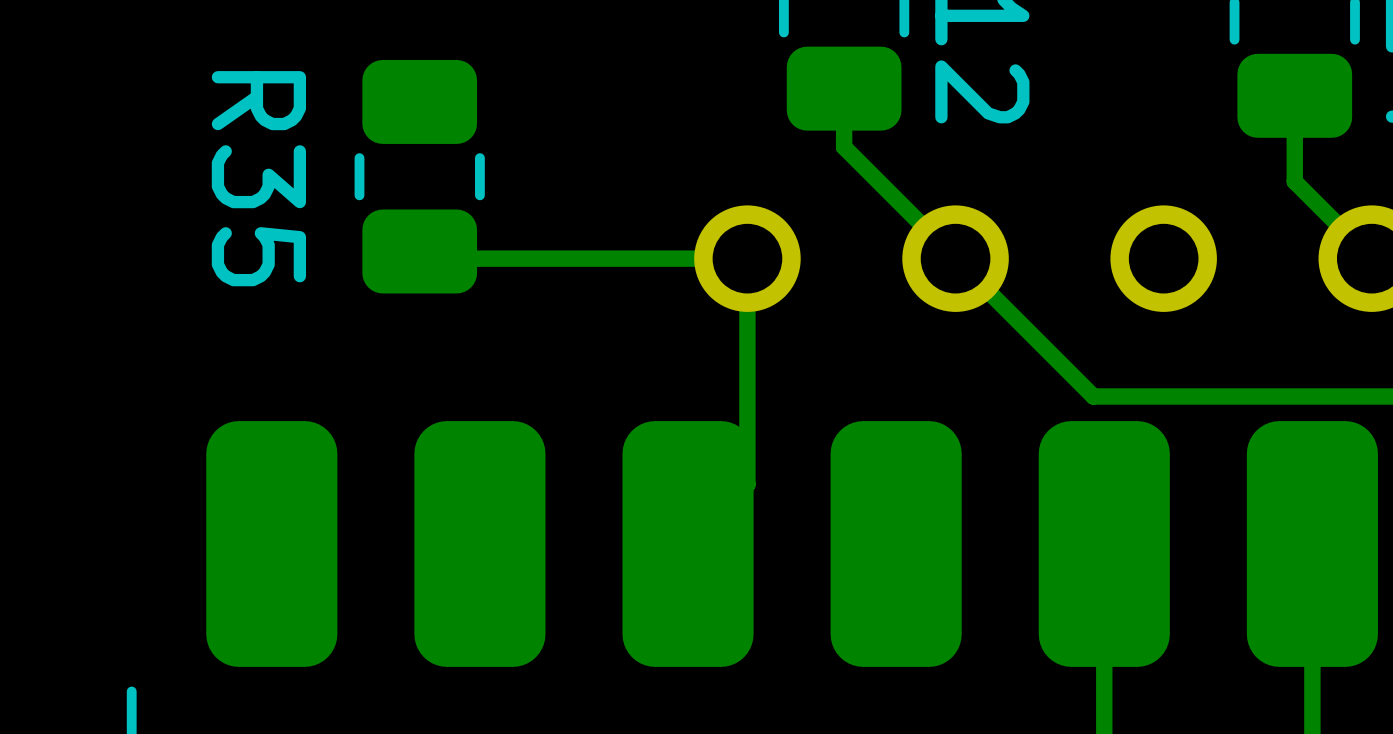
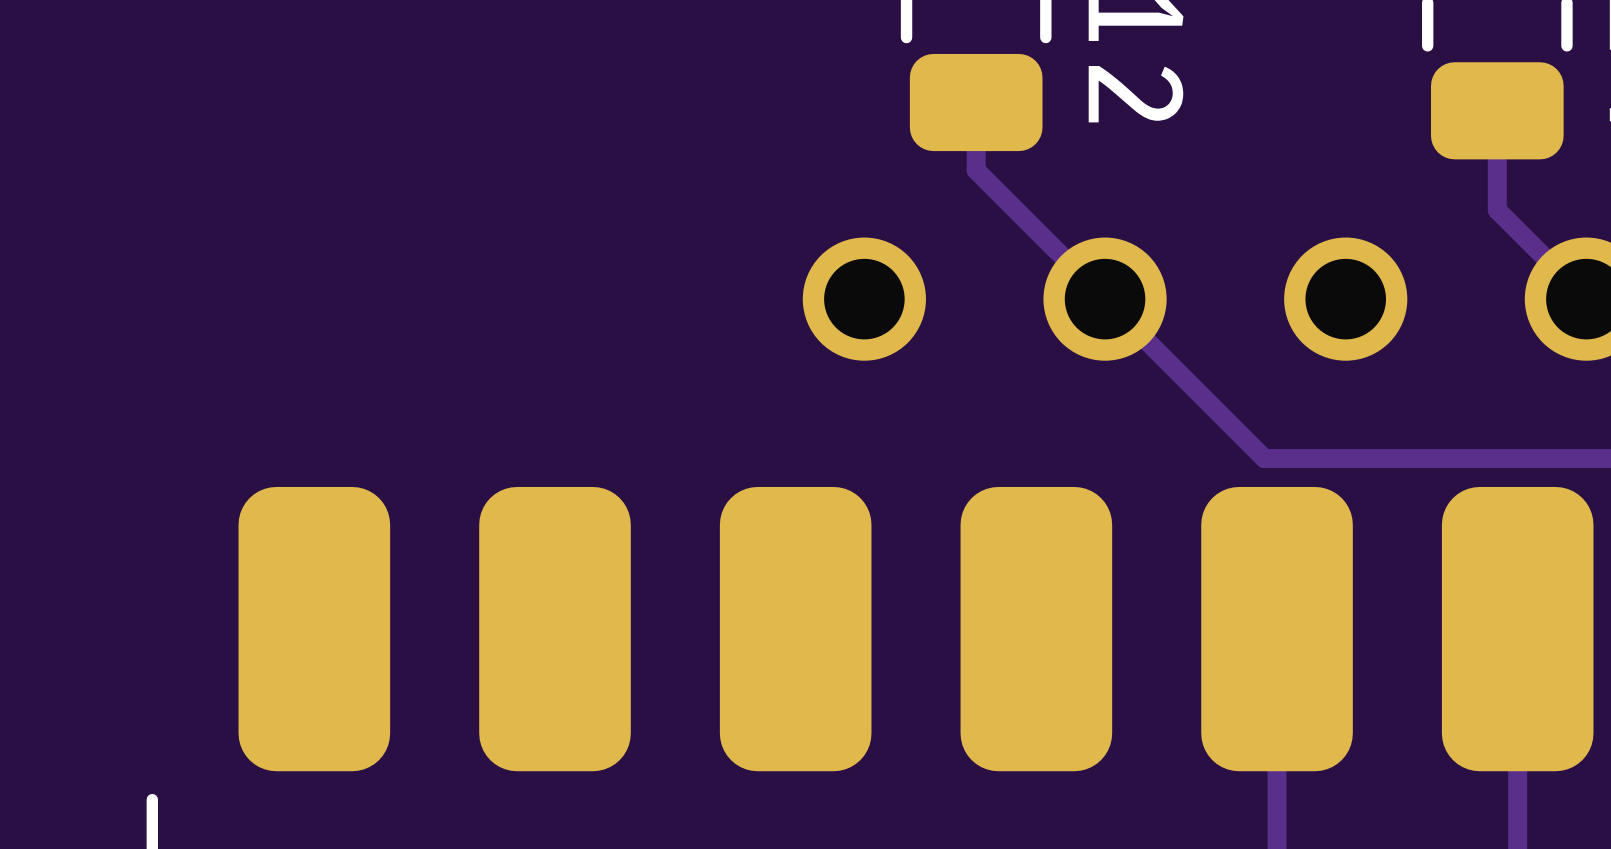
R35: (419, 176) -> none
track: (419, 251) (426, 258) (747, 258) (747, 484) (688, 543) -> none

